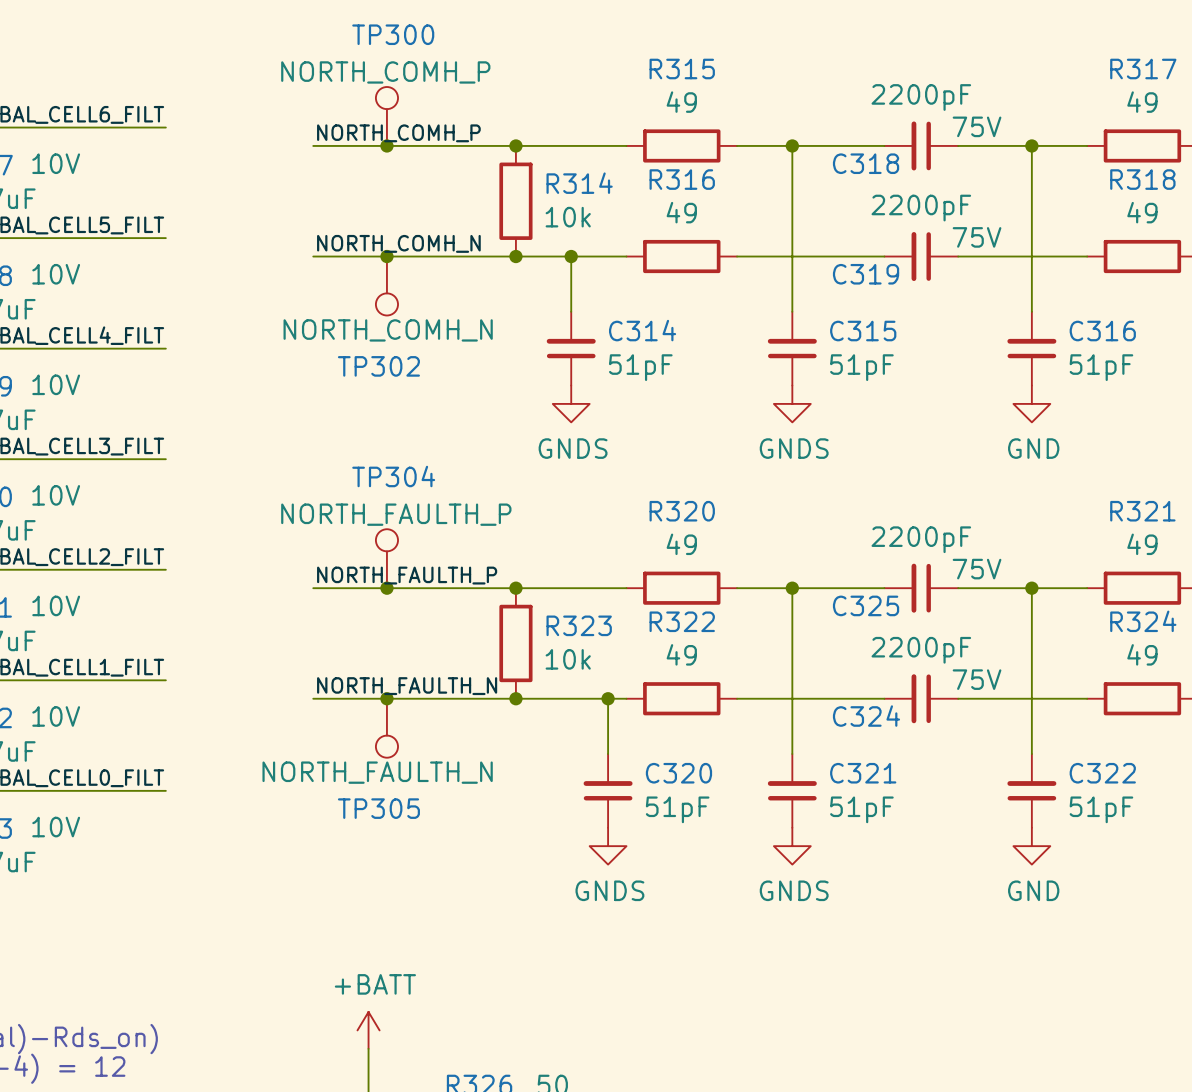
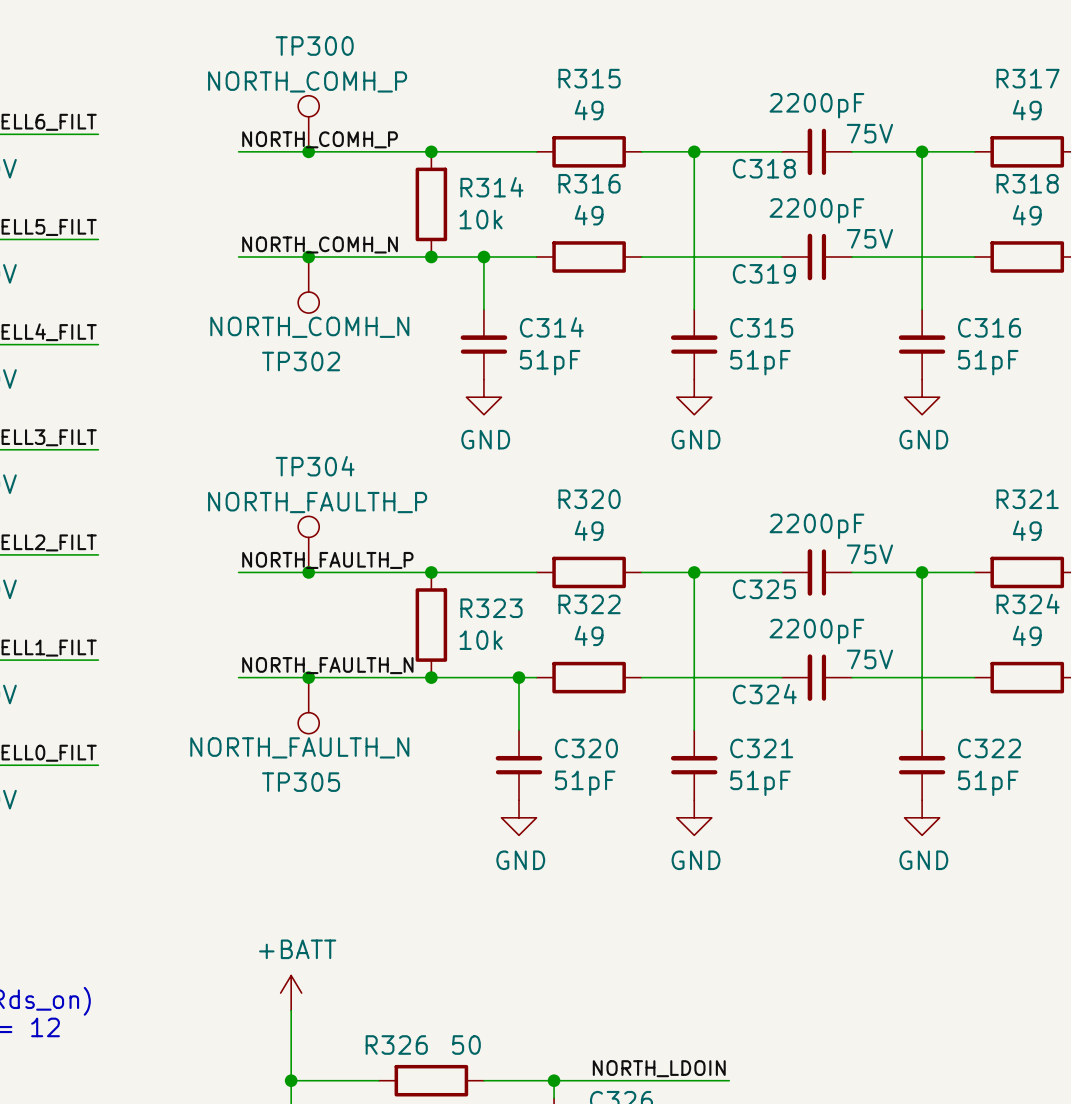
power symbol: GNDS (571, 403) -> GND (483, 397)
power symbol: GNDS (792, 403) -> GND (694, 397)
power symbol: GNDS (608, 846) -> GND (519, 817)
power symbol: GNDS (792, 846) -> GND (694, 817)

